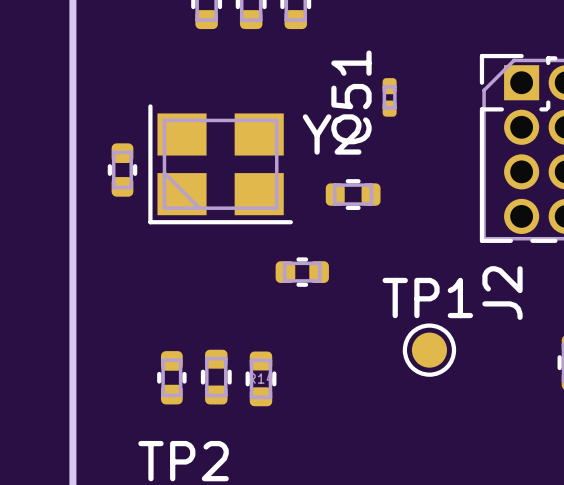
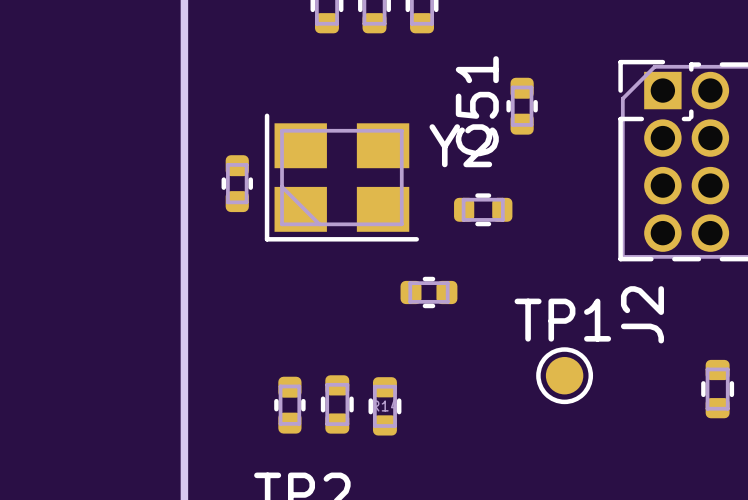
C51 footprint: [382, 78, 397, 117] -> [506, 77, 538, 135]

